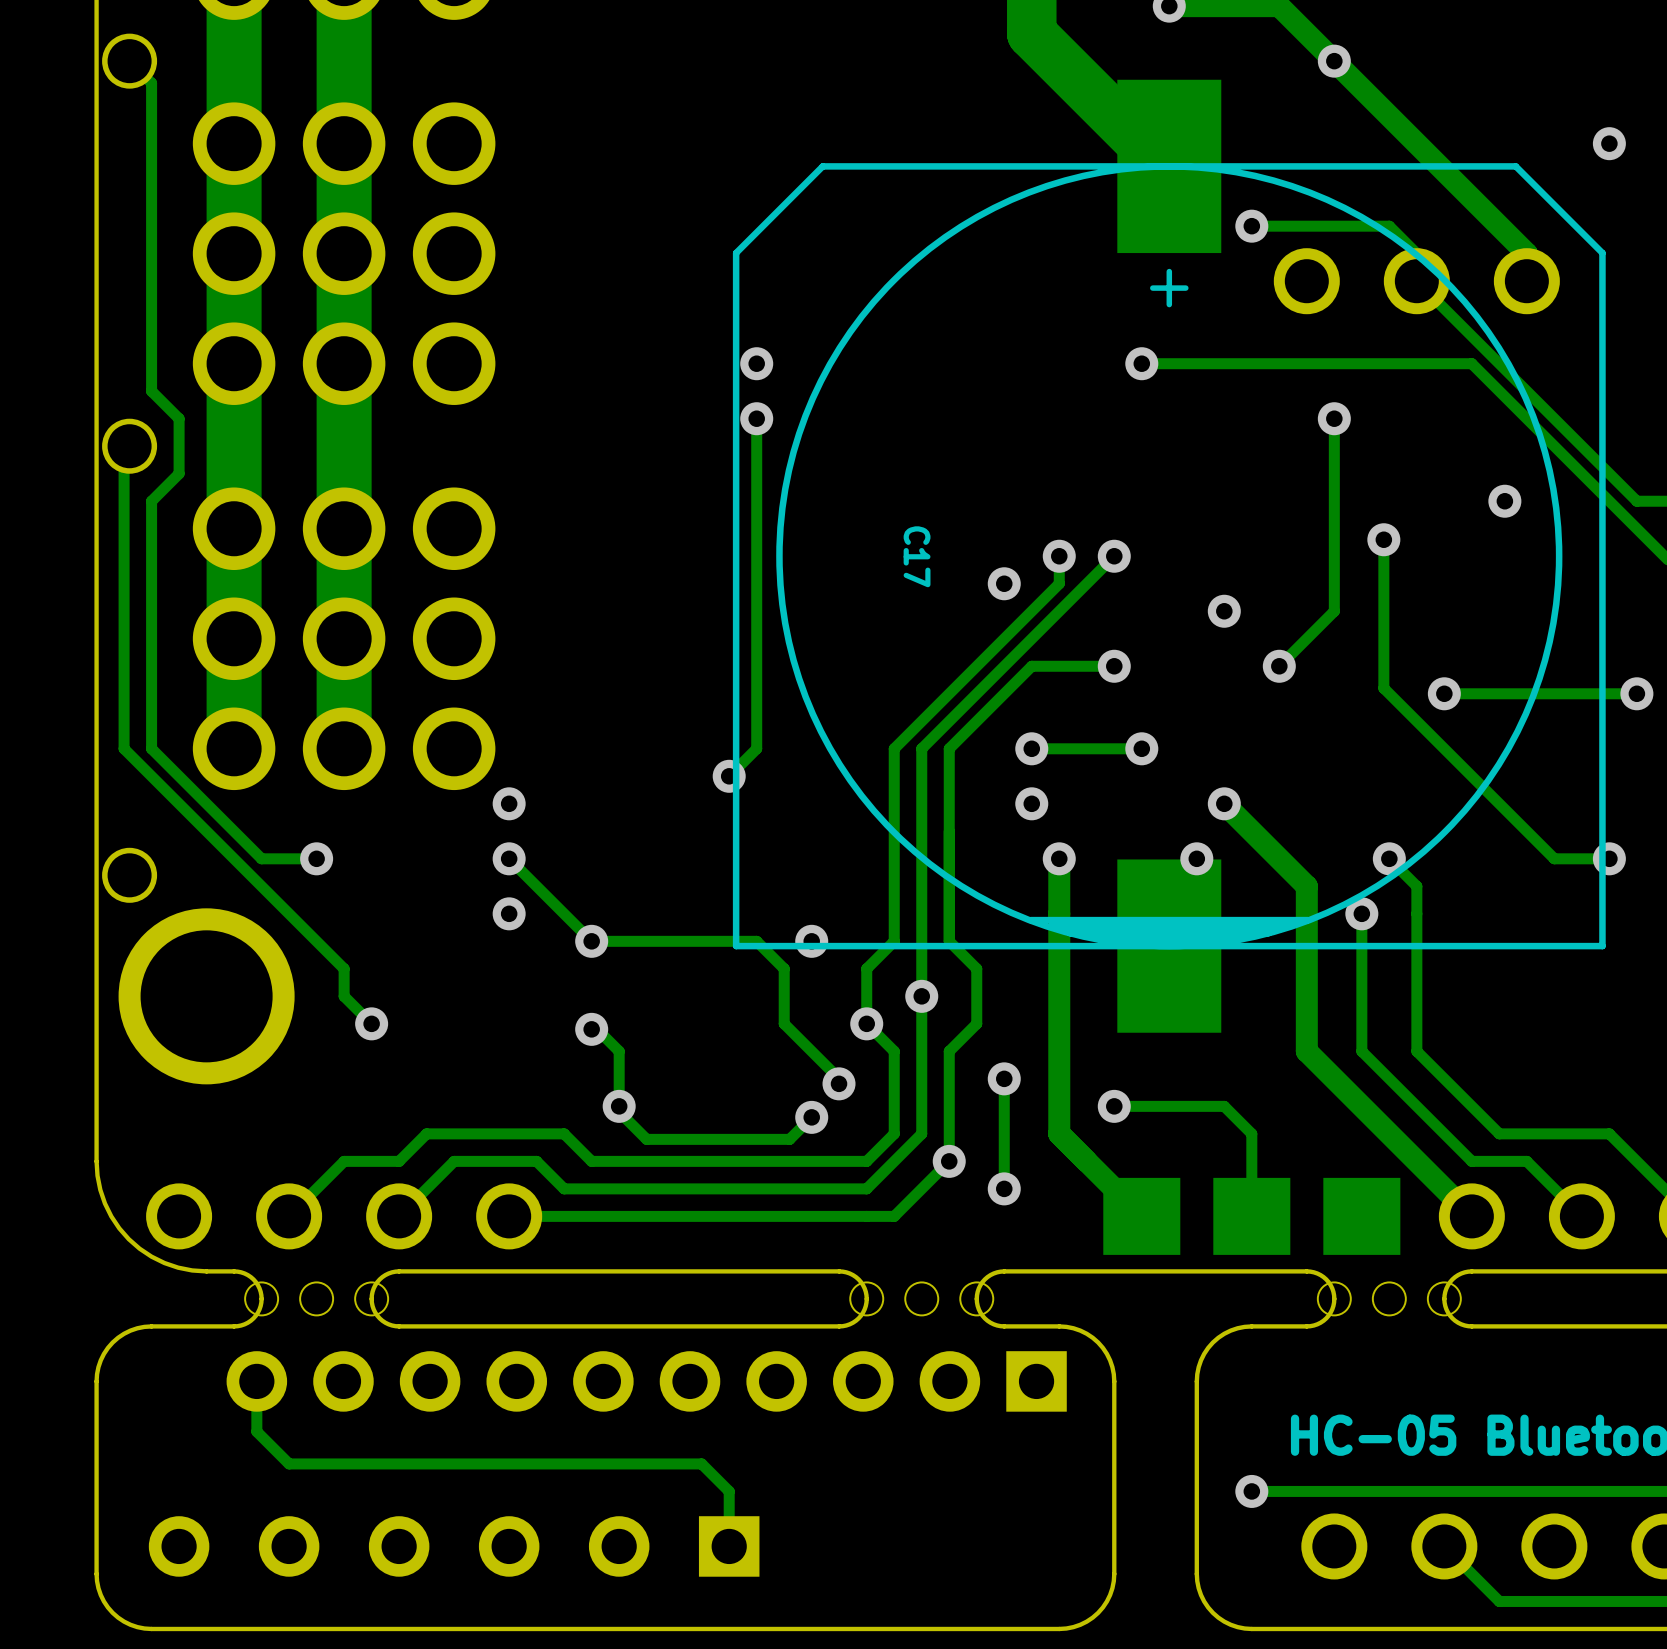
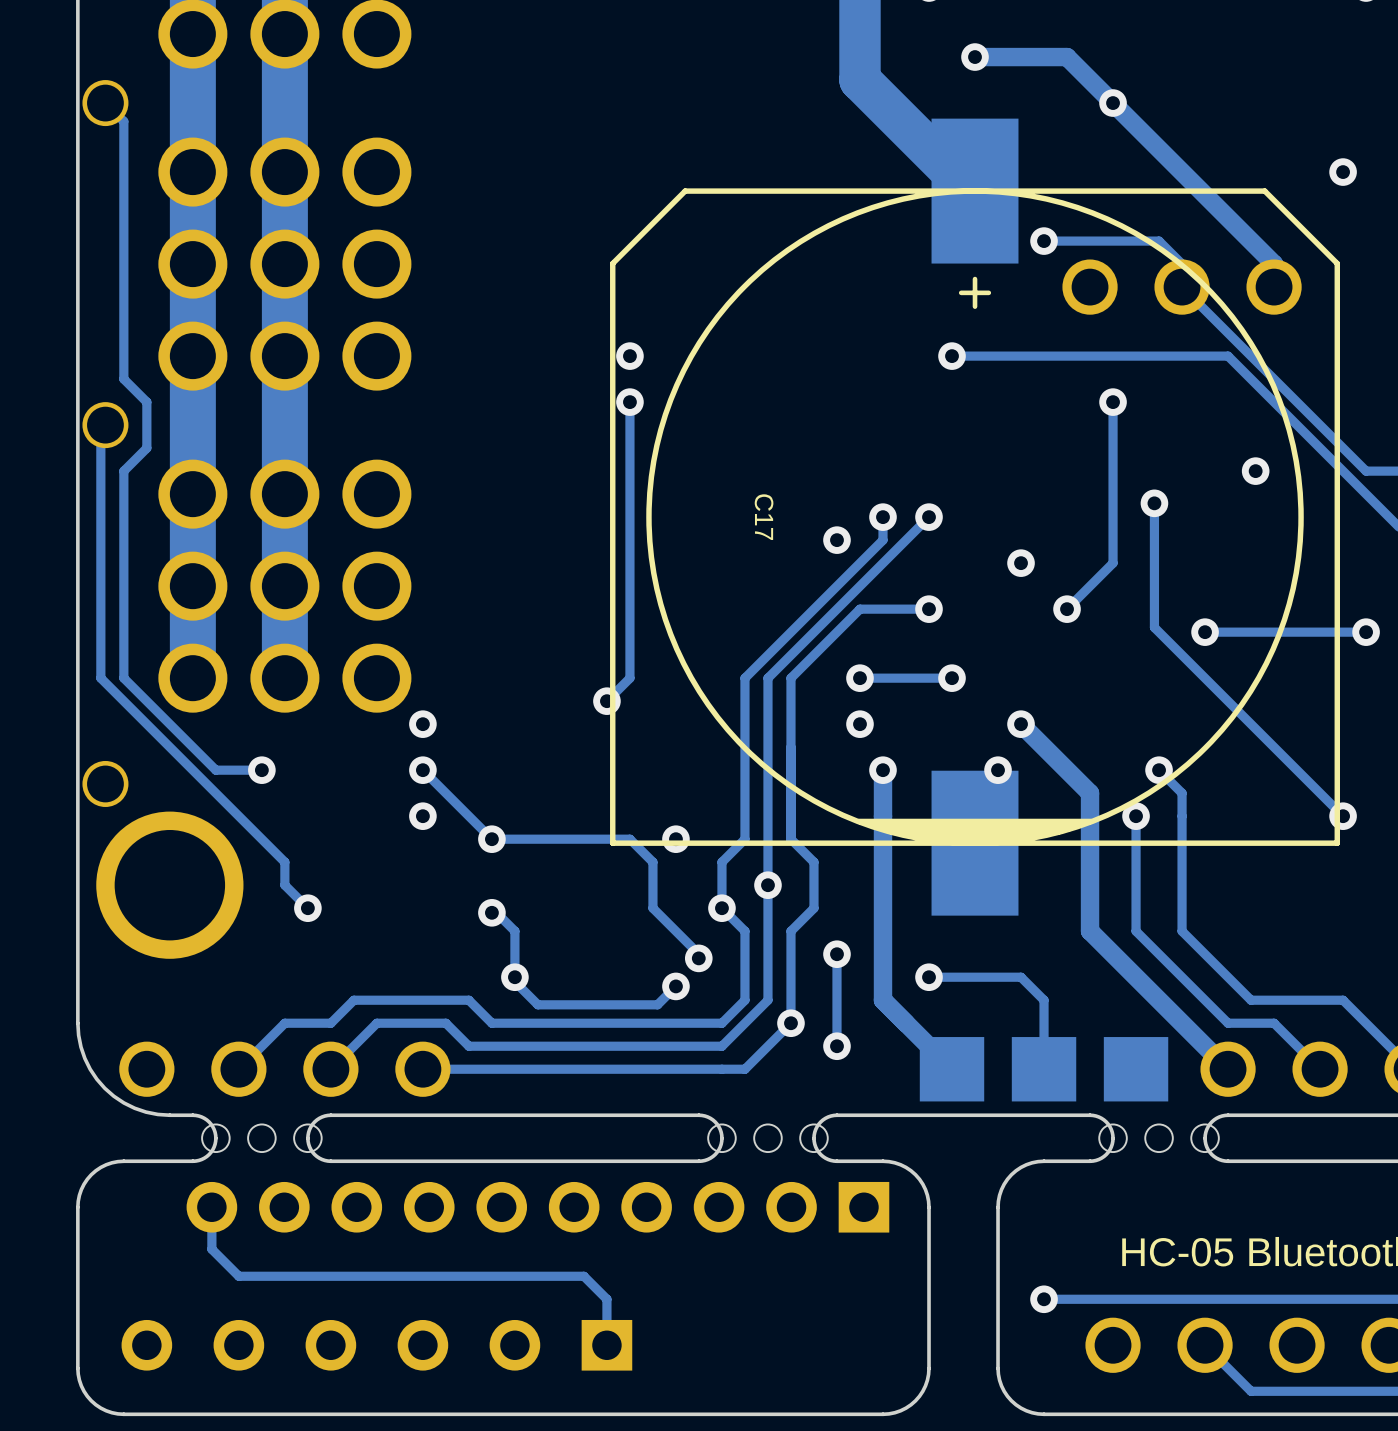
track: (1609, 858) (1554, 858) -> (1343, 816) (1297, 770)
via position: (1609, 858) -> (1343, 816)

